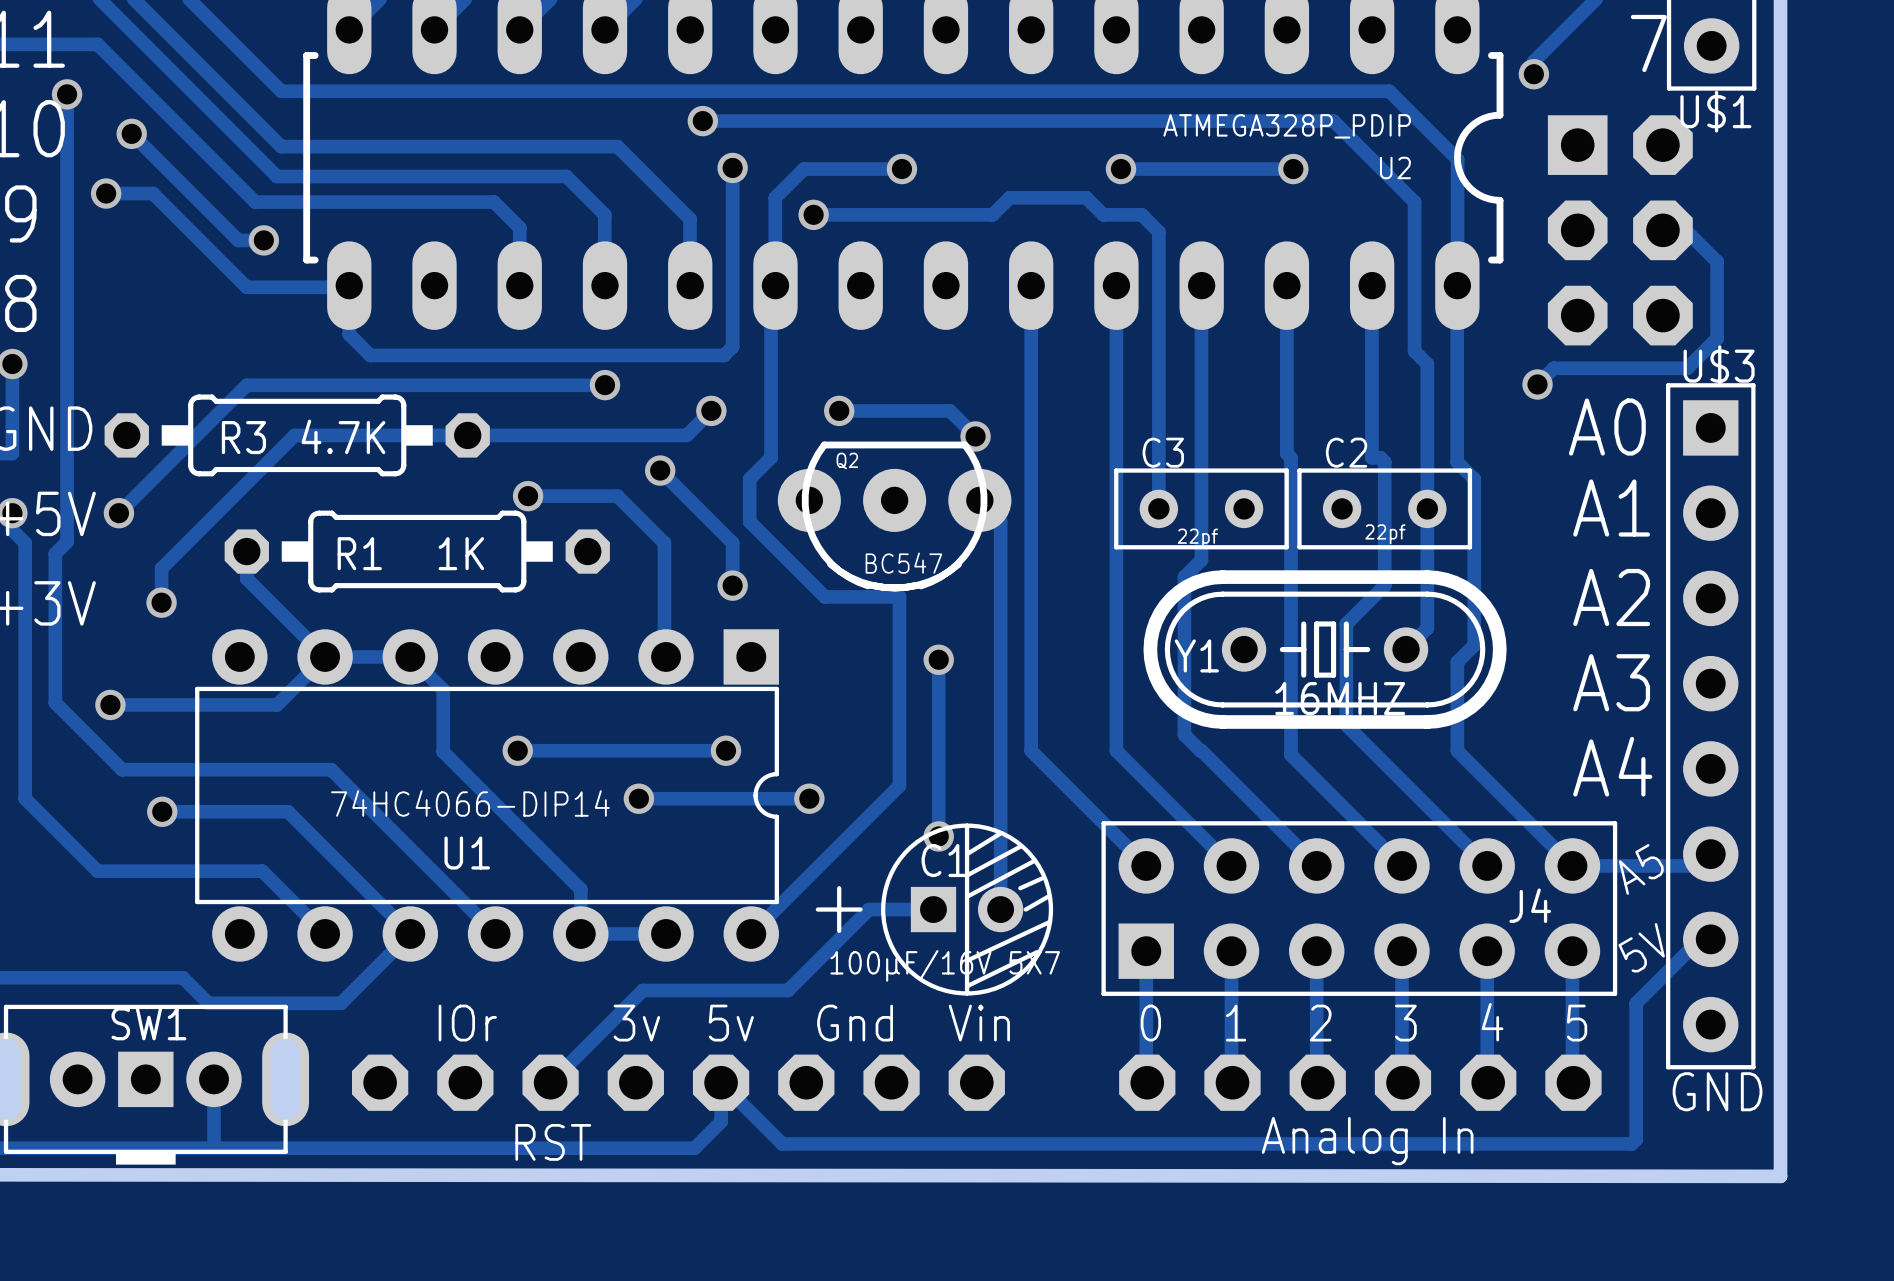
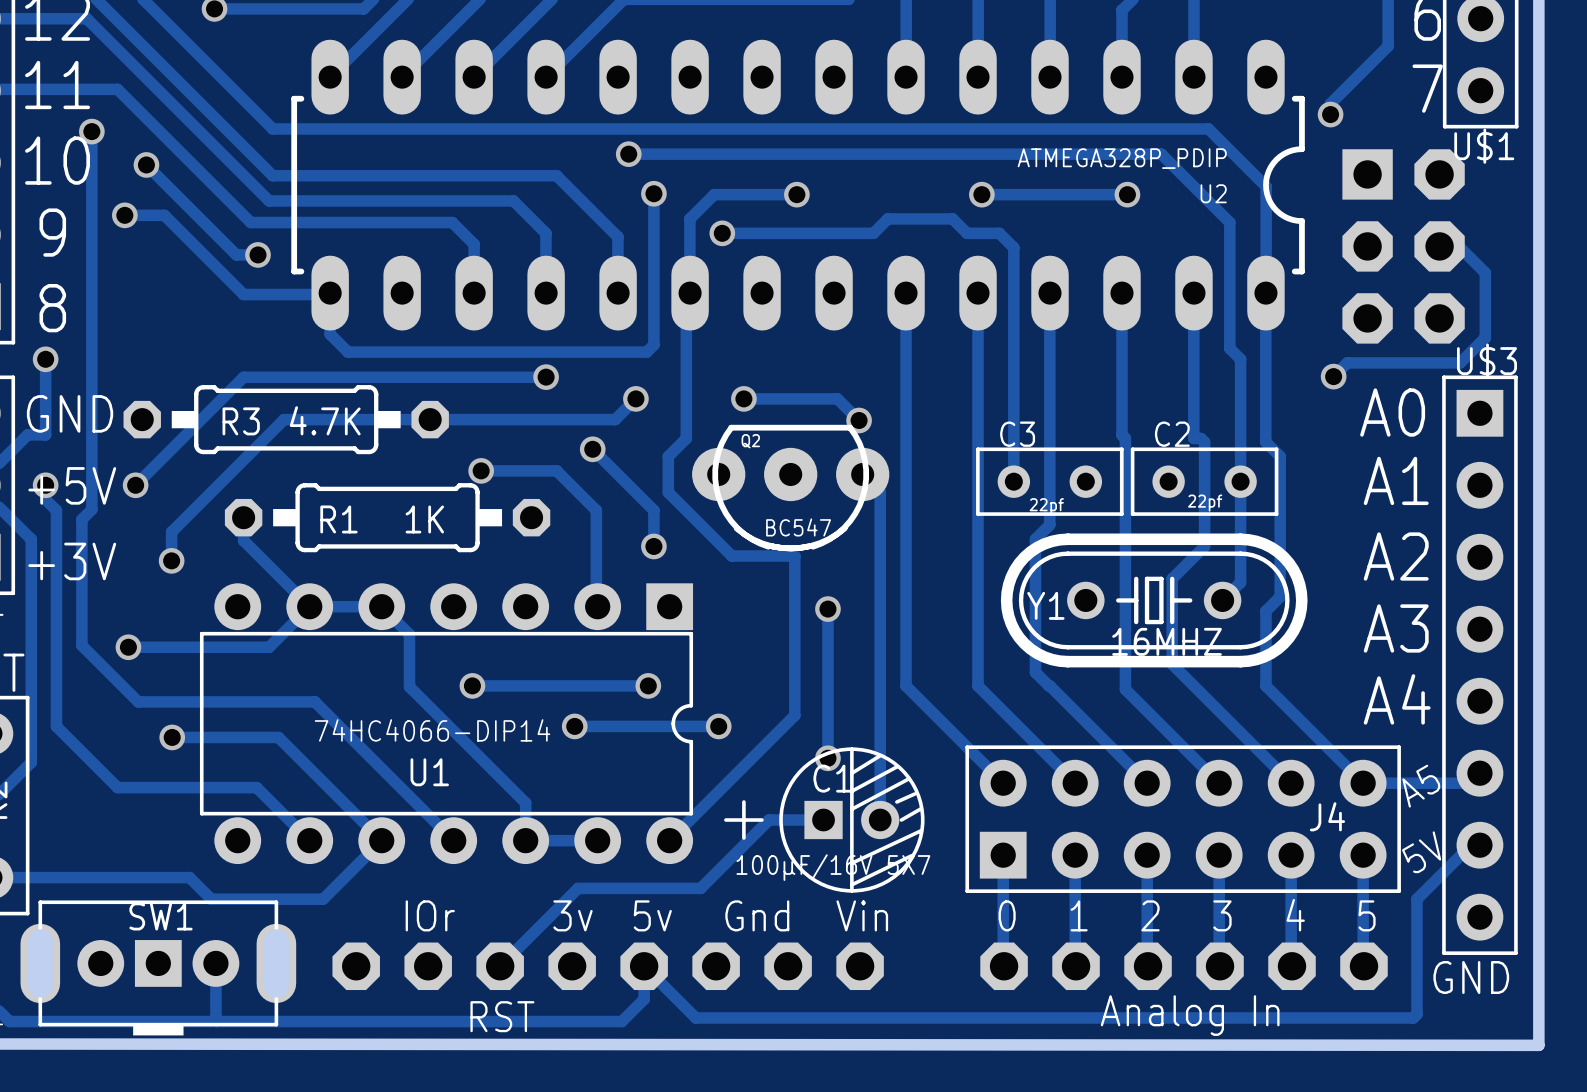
text position: GND (1717, 1091) -> GND (1471, 977)

